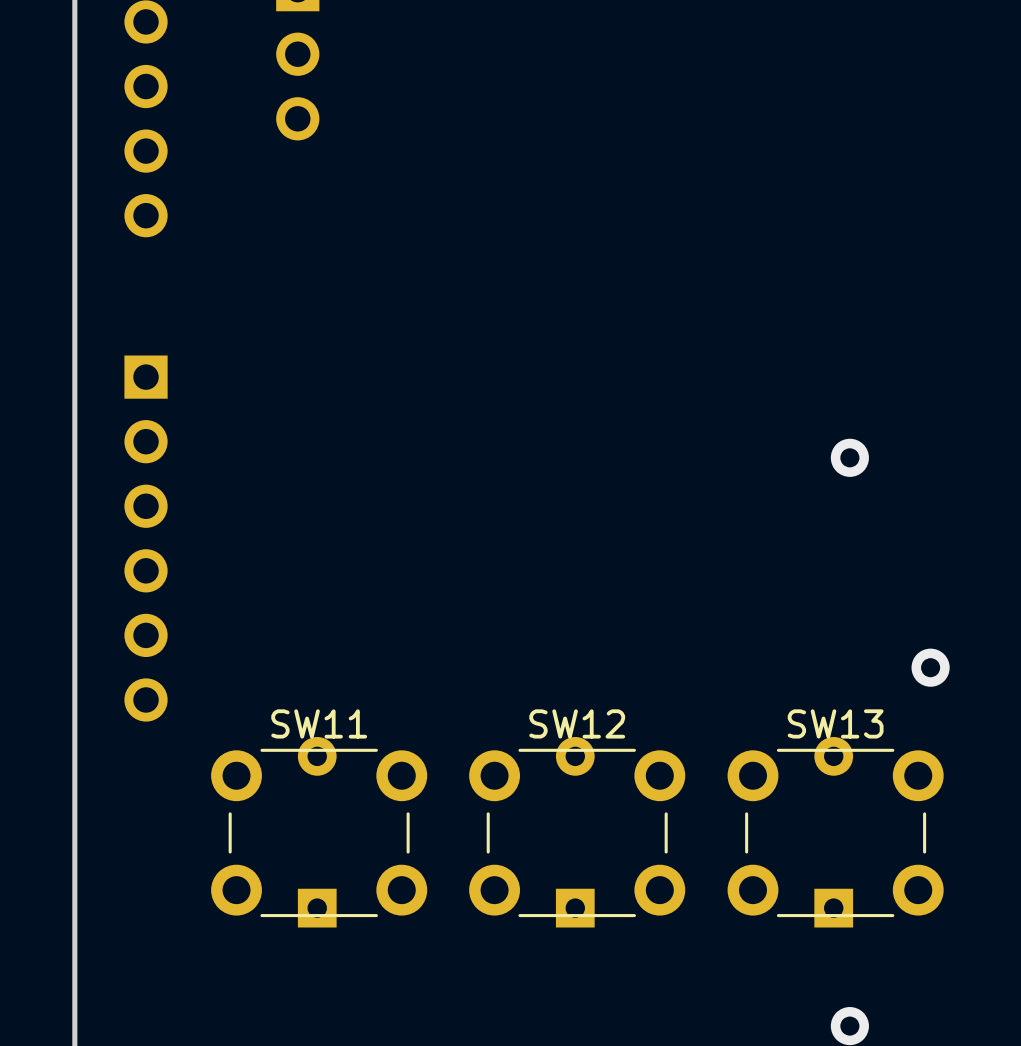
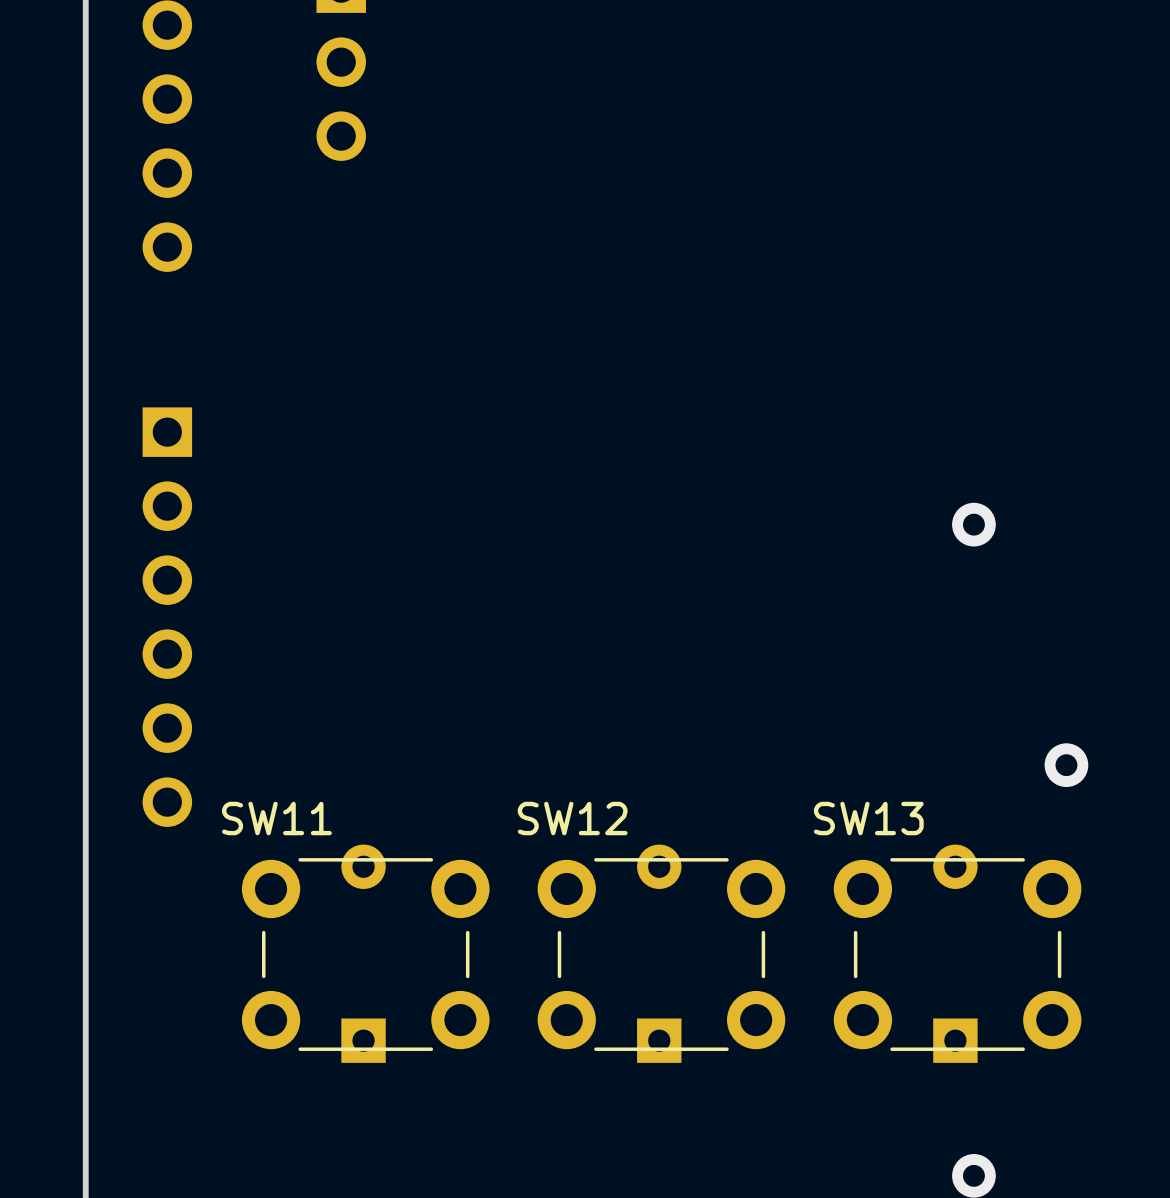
SW11 name position: SW11 (319, 723) -> SW11 (276, 818)
SW12 name position: SW12 (577, 723) -> SW12 (572, 818)
SW13 name position: SW13 (835, 723) -> SW13 (868, 818)

